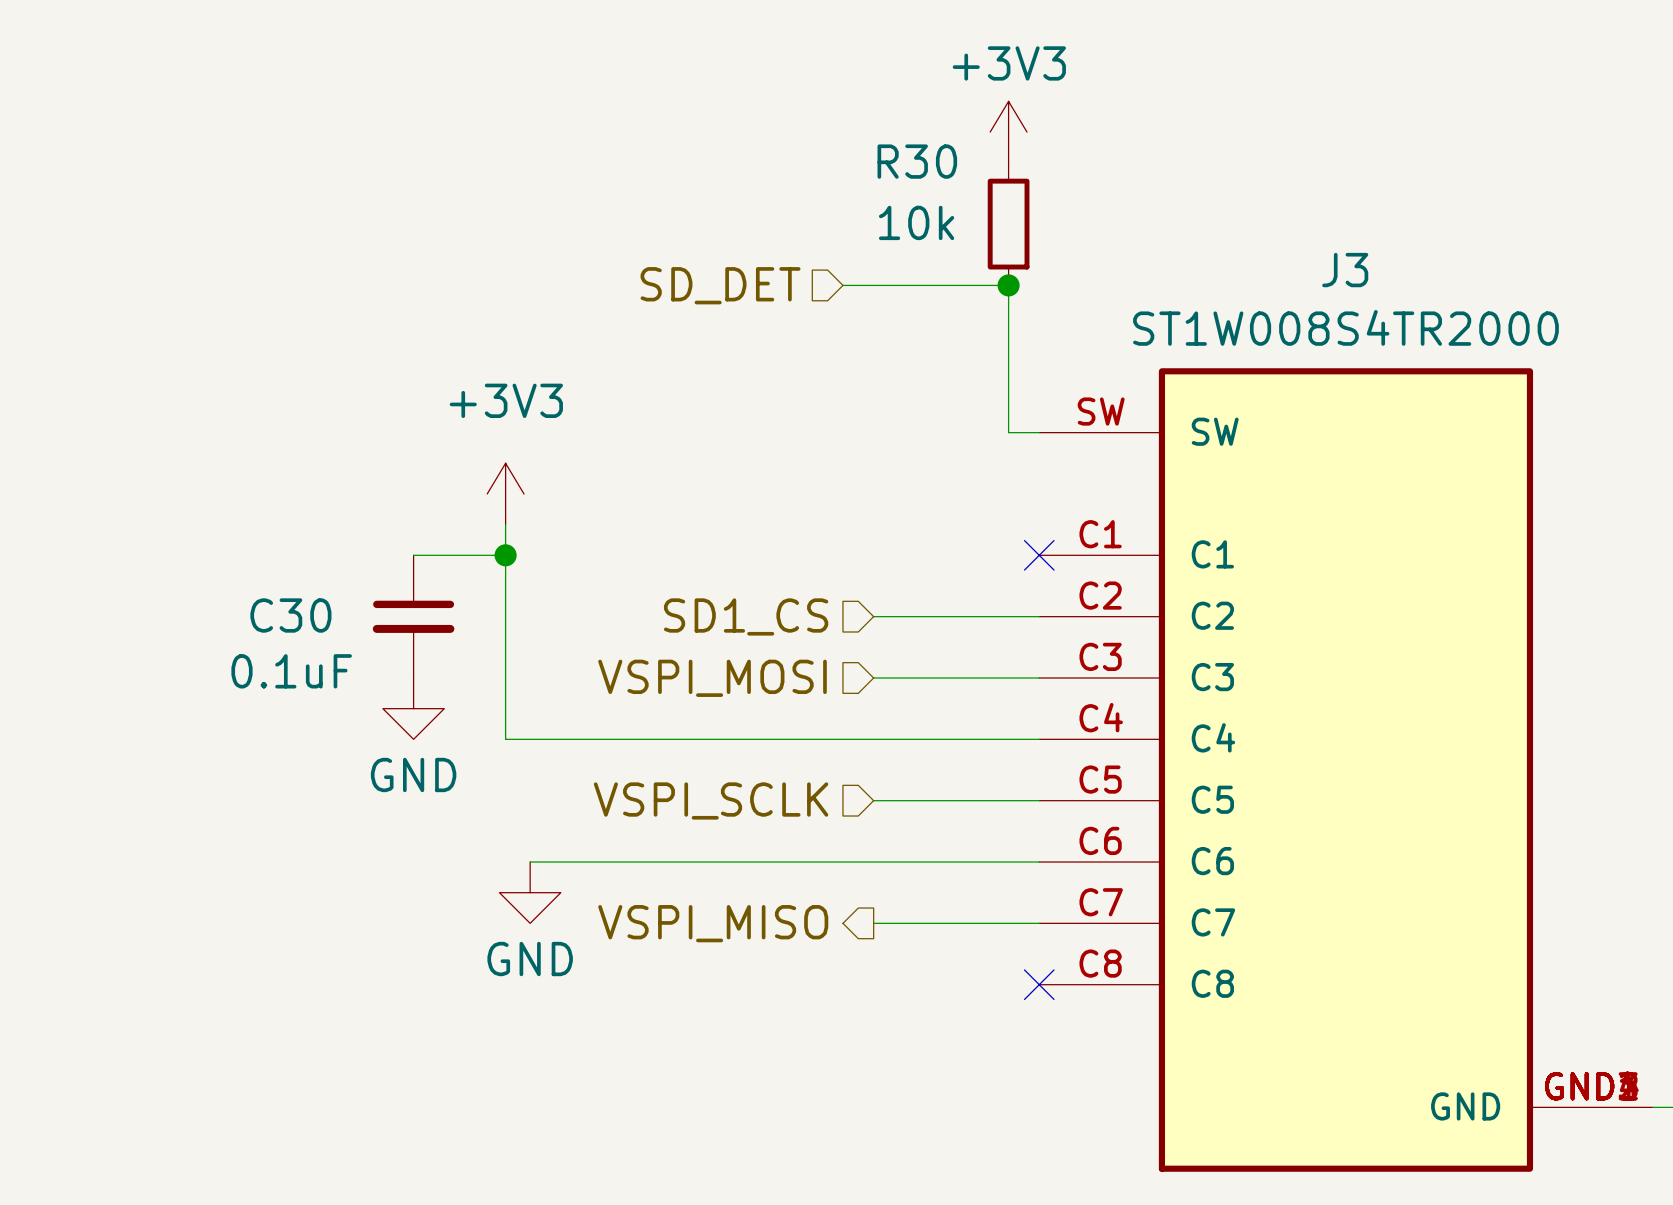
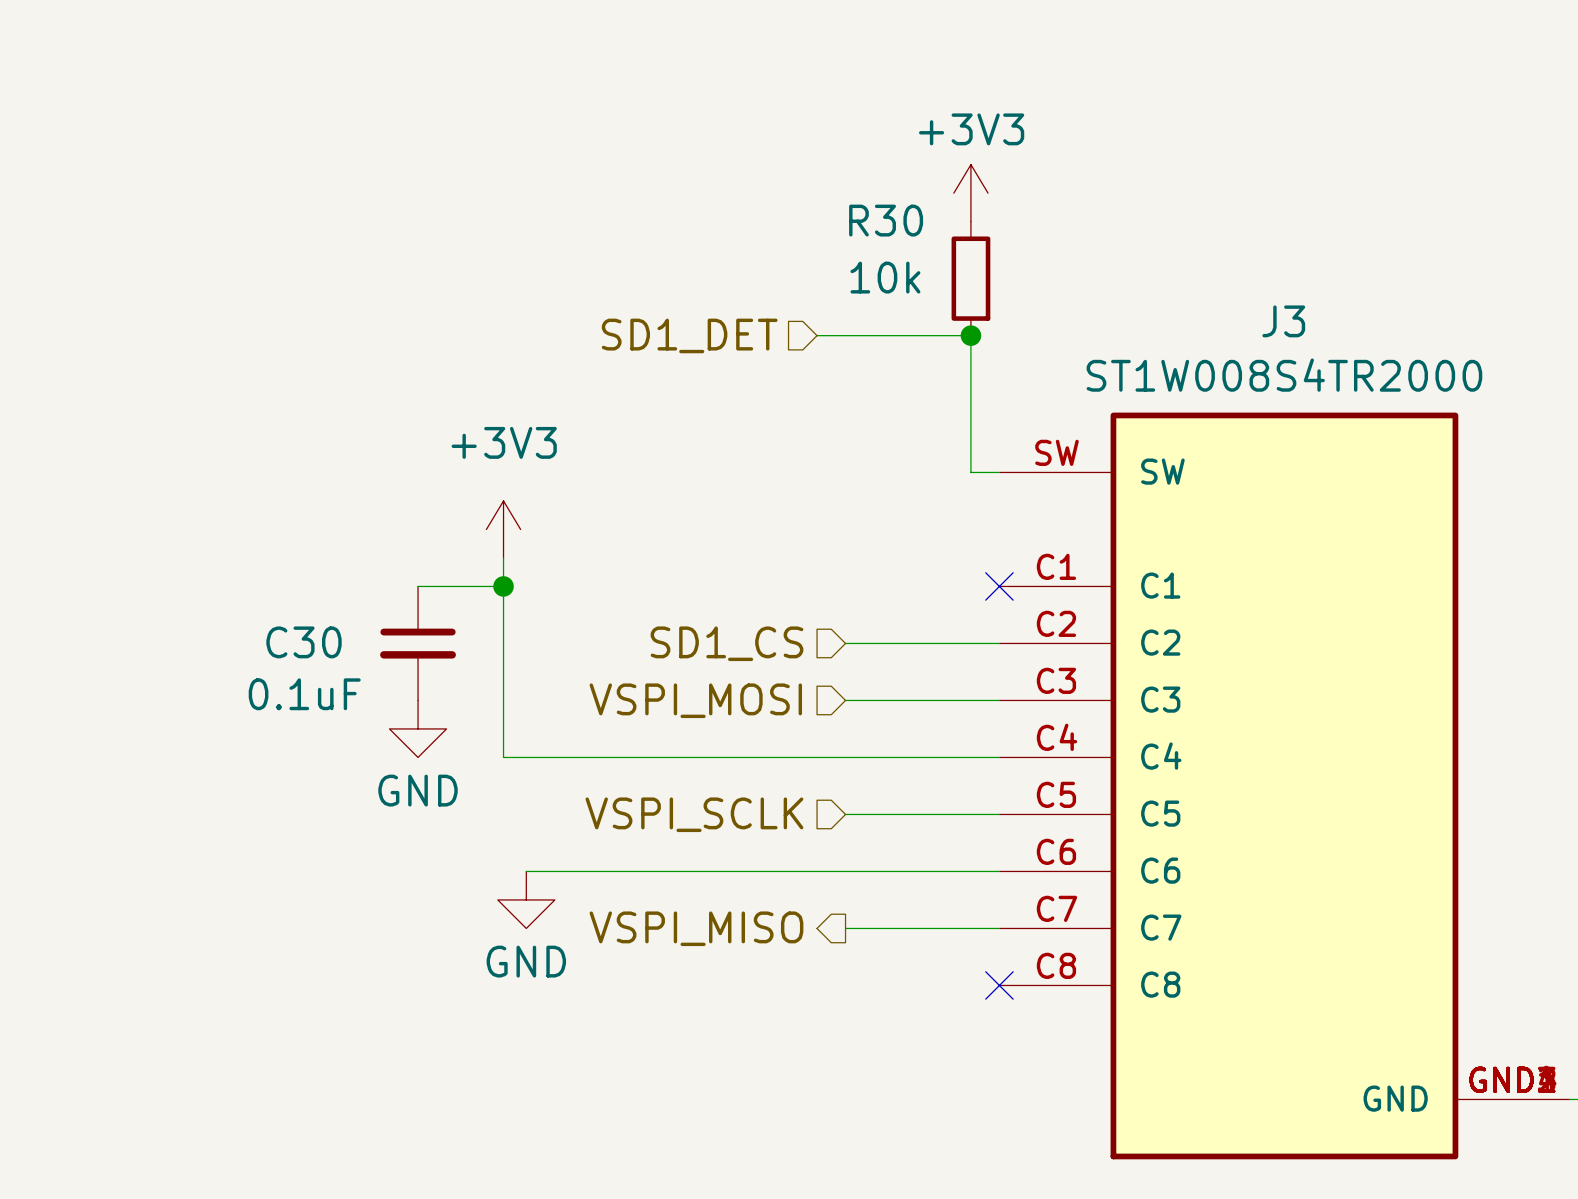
hierarchical label: SD_DET (720, 285) -> SD1_DET (689, 335)

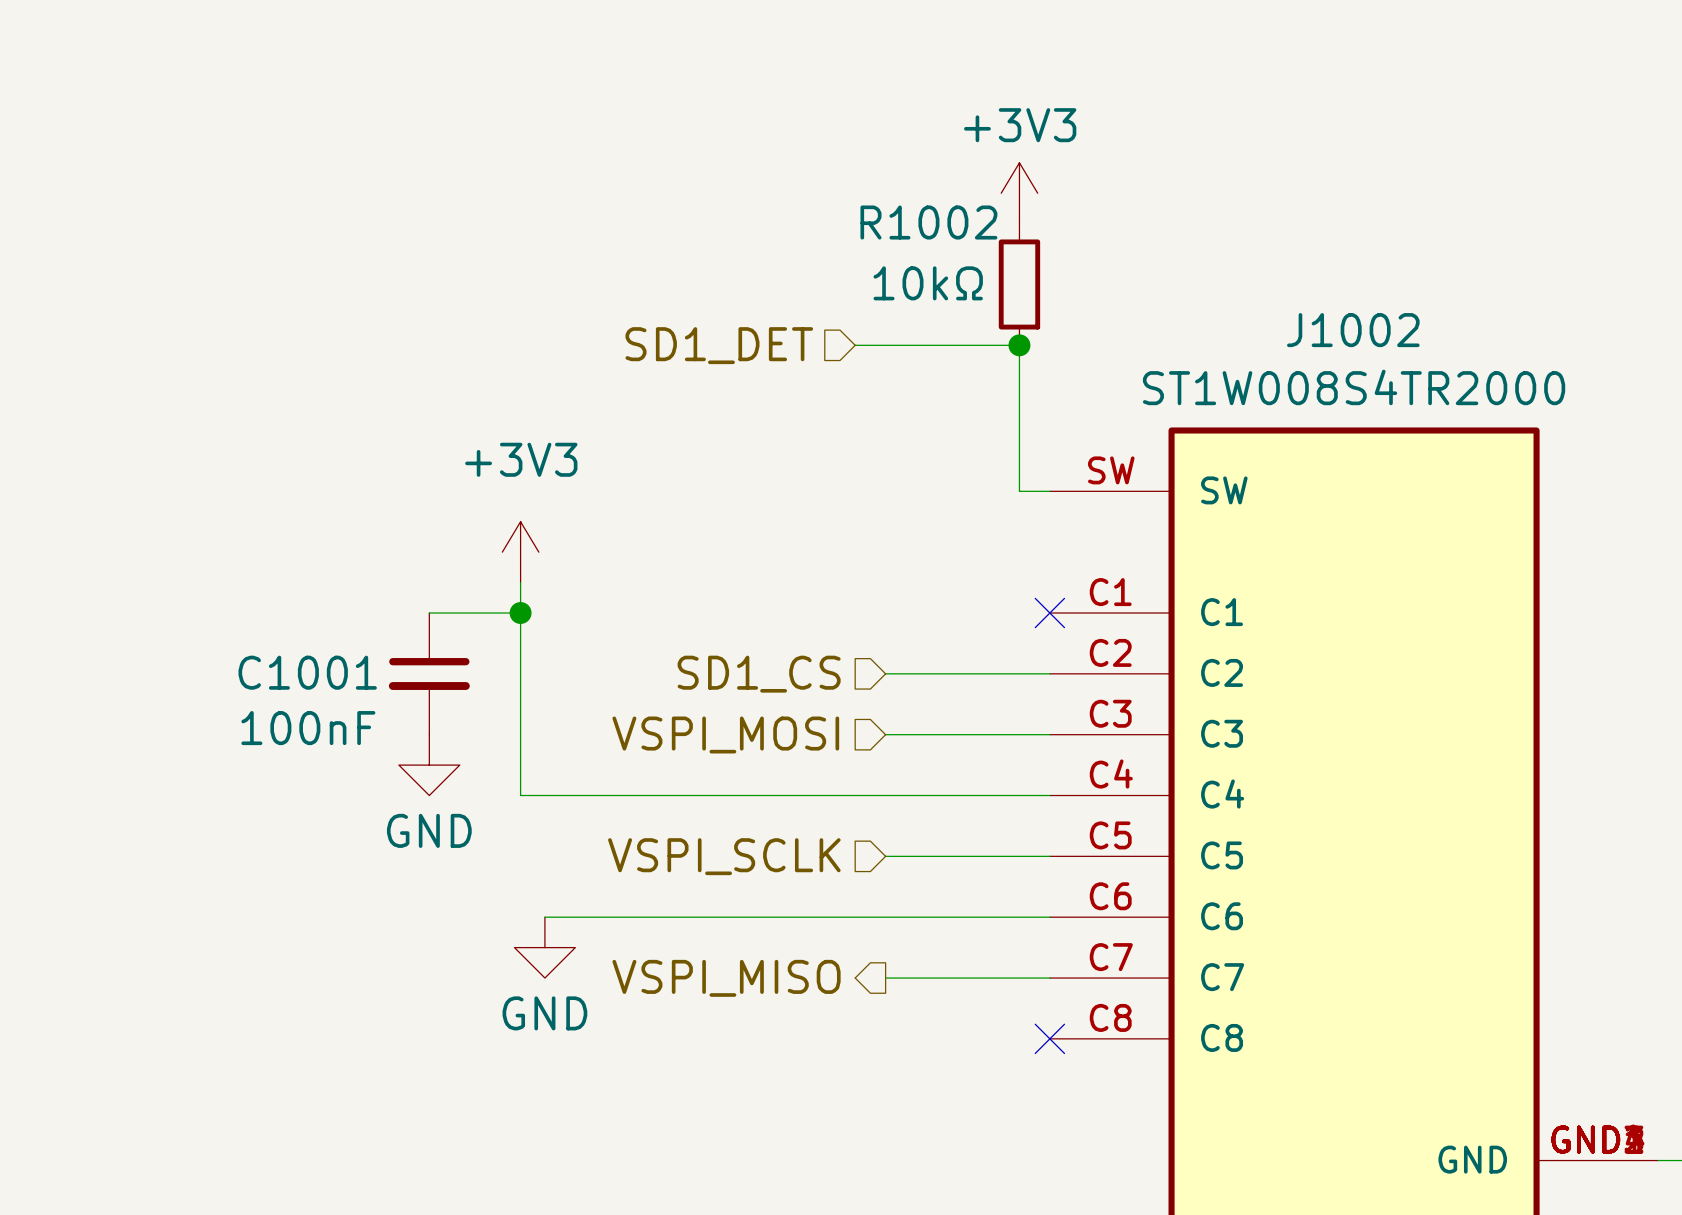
R30 name: R30 (886, 220) -> R1002 (928, 222)
R30 value: 10k (885, 277) -> 10kΩ (928, 283)
J3 name: J3 (1283, 321) -> J1002 (1353, 330)
C30 name: C30 (304, 642) -> C1001 (307, 672)
C30 value: 0.1uF (304, 694) -> 100nF (308, 728)

